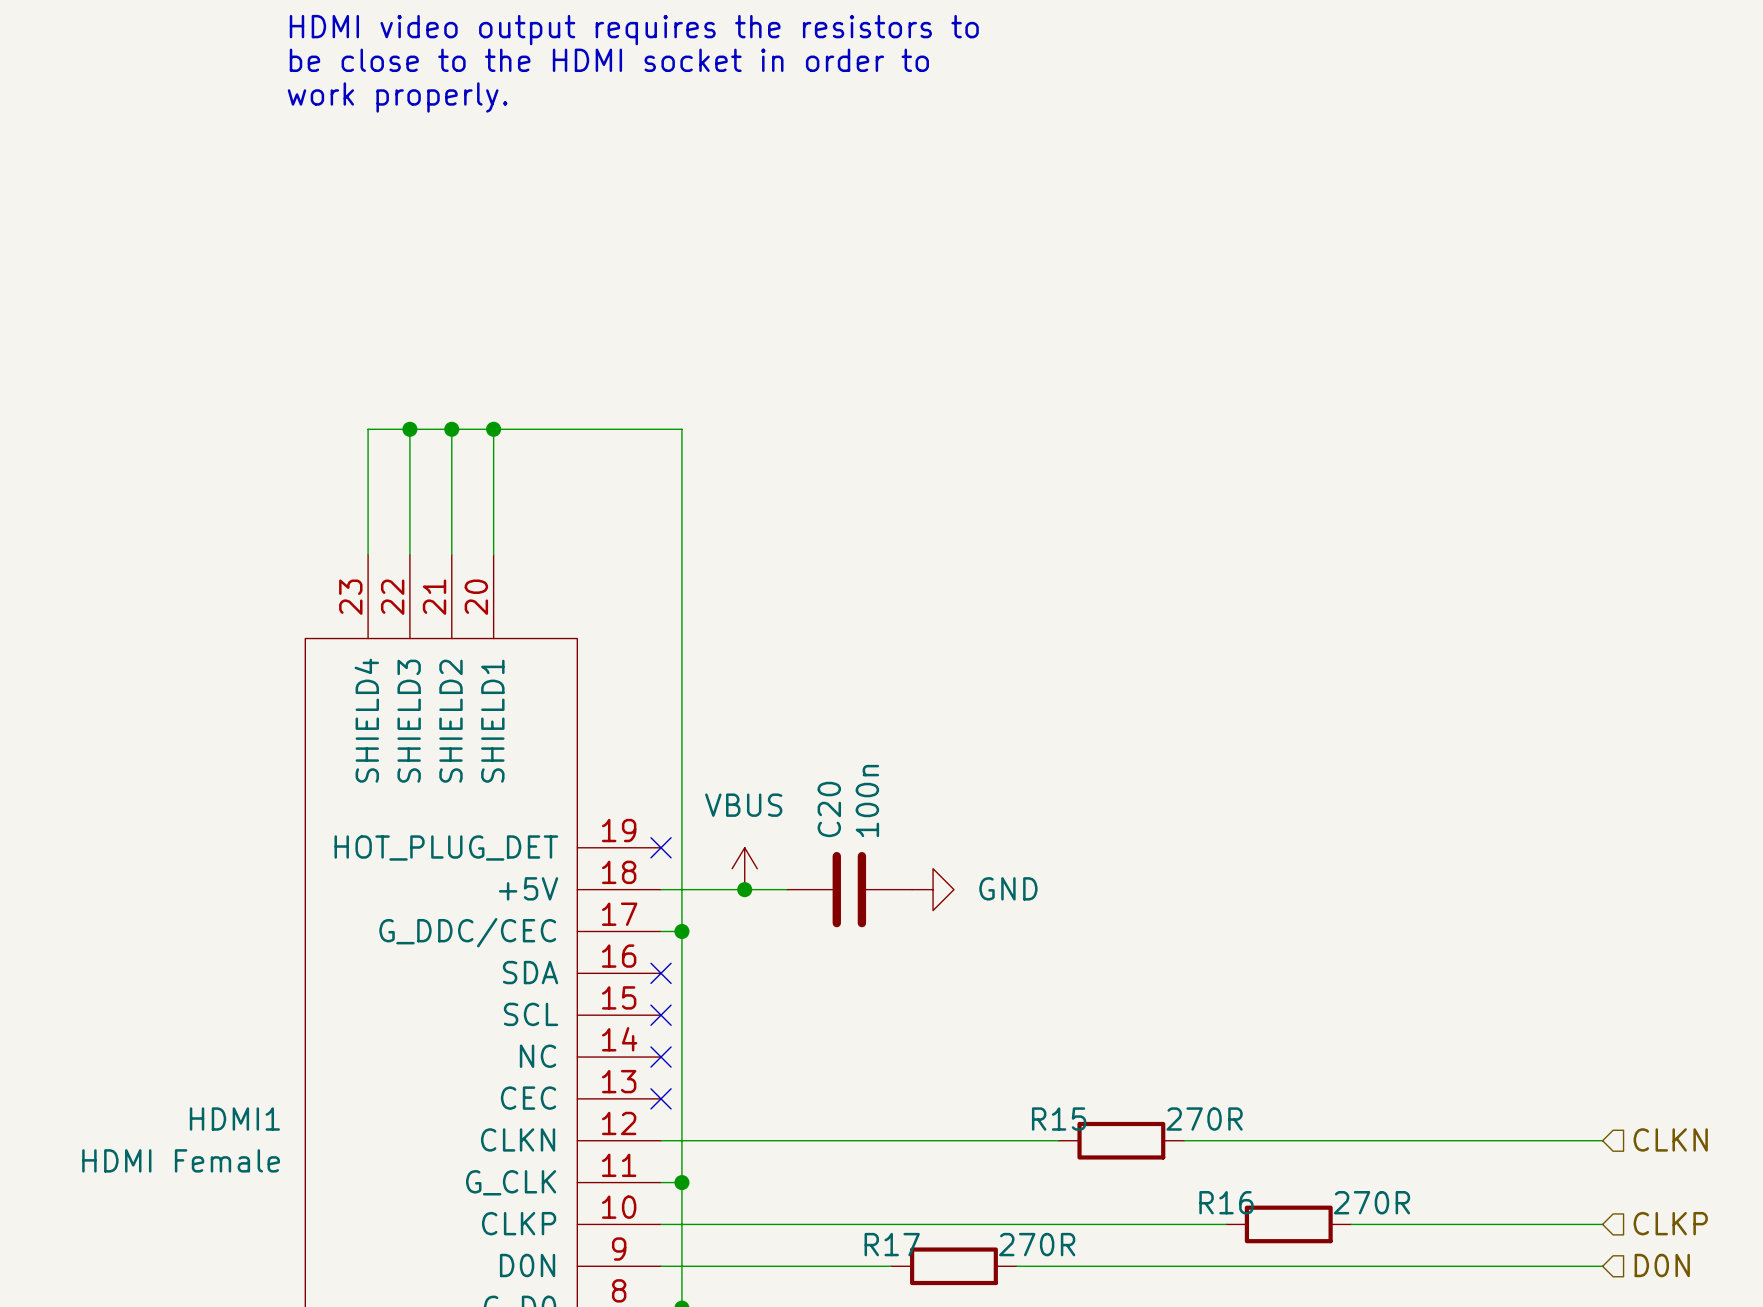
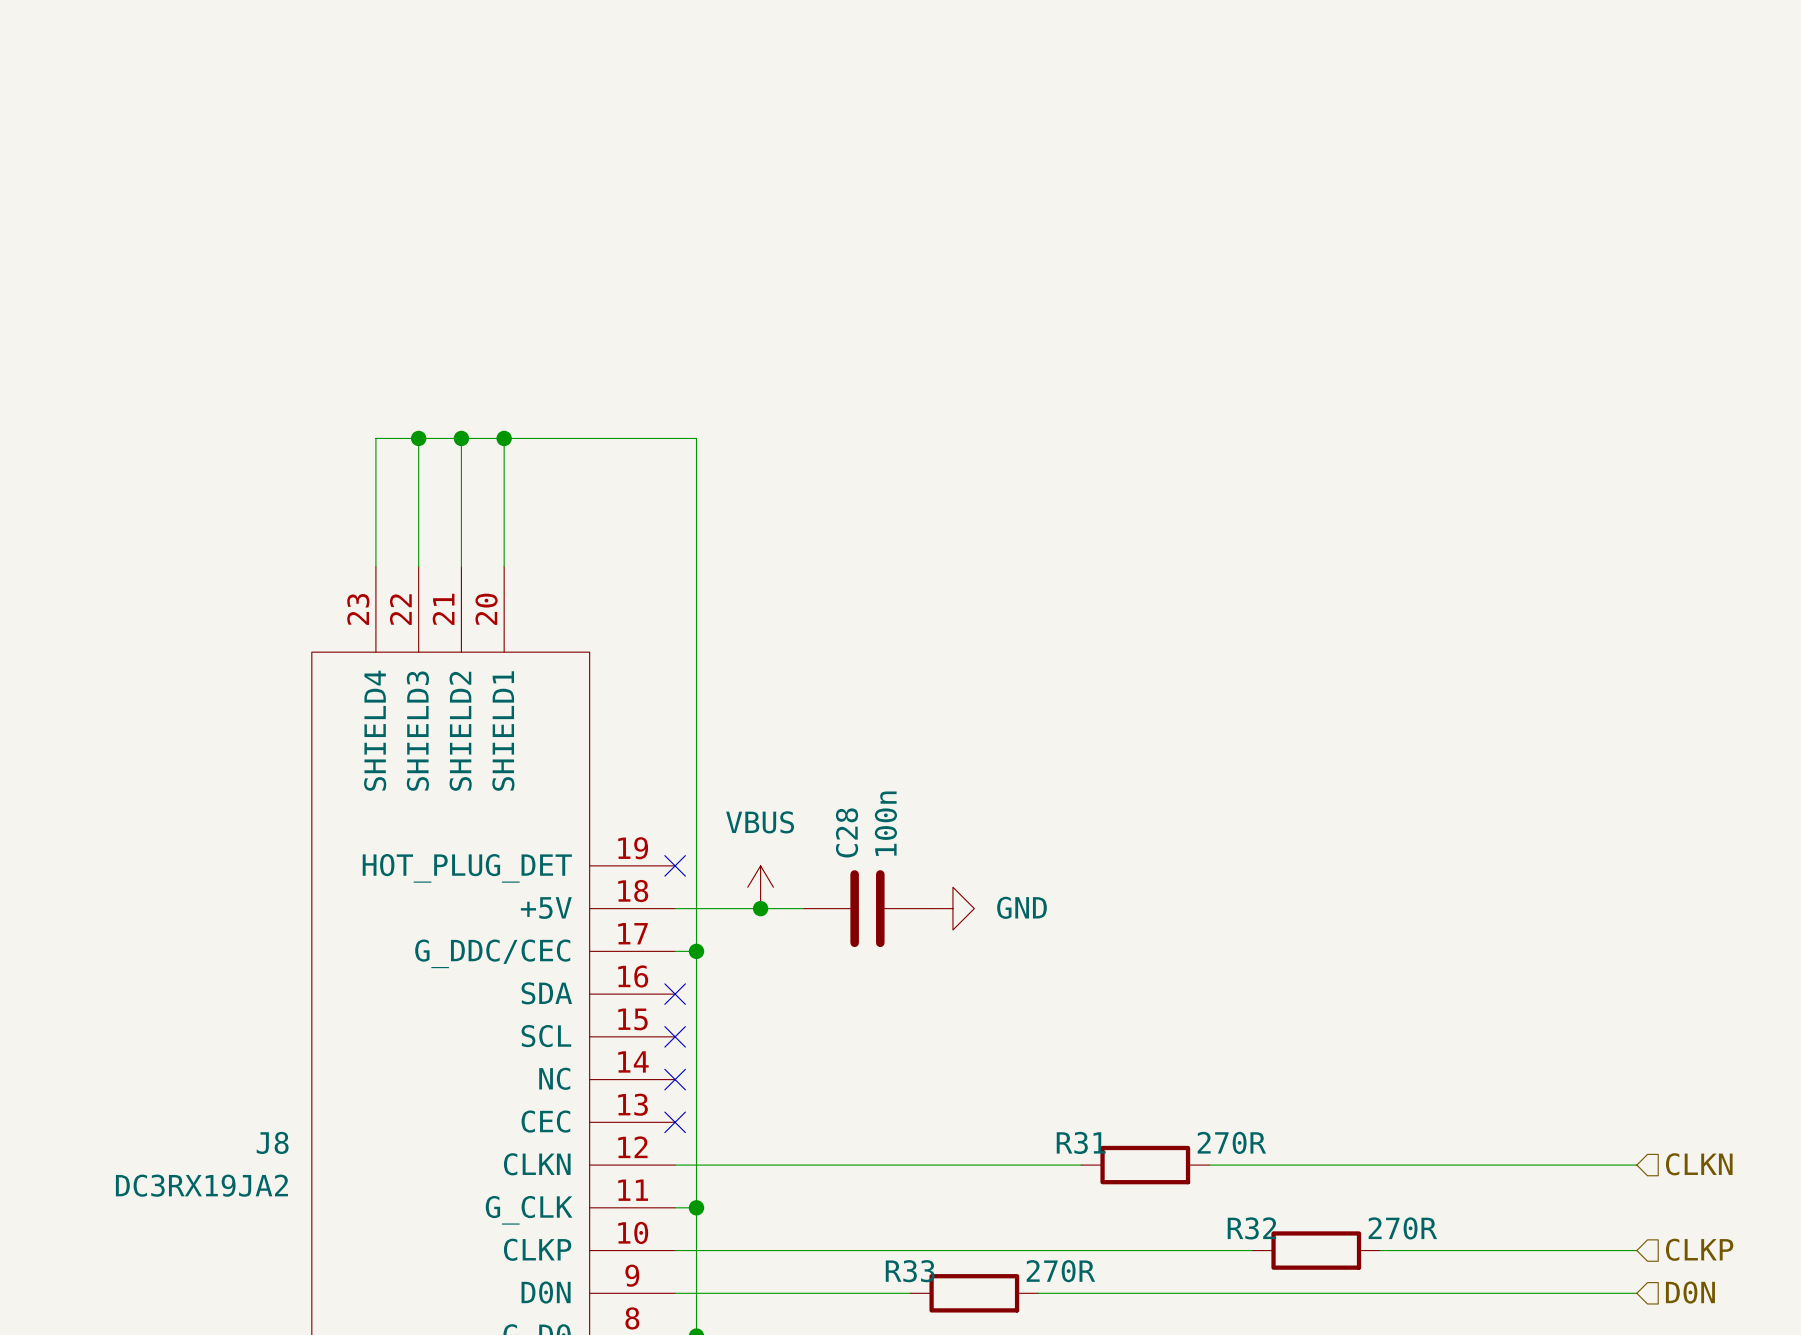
text: HDMI video output requires the resistors to (634, 30) -> none
text: be close to the HDMI socket in order to (609, 60) -> none
text: work properly. (397, 97) -> none
C20 name: C20 (829, 809) -> C28 (847, 832)
HDMI1 name: HDMI1 (234, 1119) -> J8 (272, 1142)
R15 name: R15 (1059, 1119) -> R31 (1081, 1142)
HDMI1 value: HDMI Female (181, 1160) -> DC3RX19JA2 (201, 1185)
R16 name: R16 (1226, 1202) -> R32 (1251, 1228)
R17 name: R17 (892, 1244) -> R33 (910, 1271)

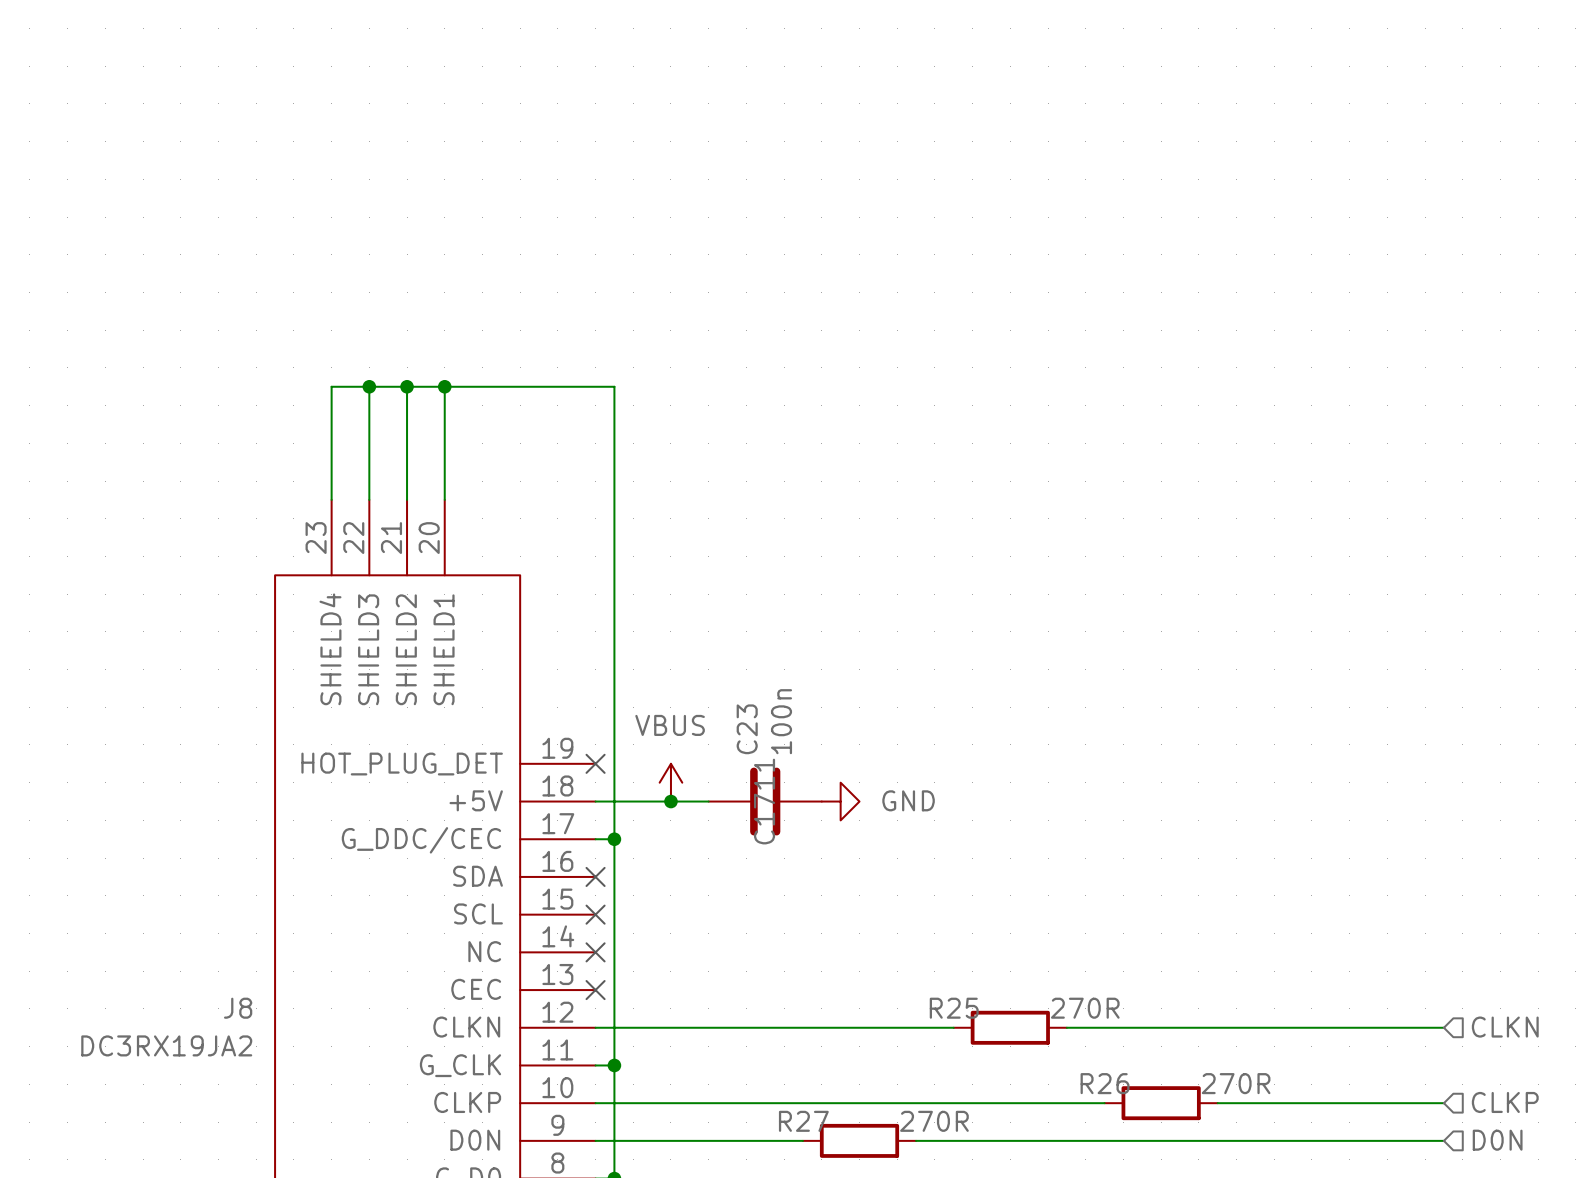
C28 name: C28 (847, 832) -> C23 (747, 729)
C28 text: none -> C1711 (764, 801)
R31 name: R31 (1081, 1142) -> R25 (954, 1008)
R32 name: R32 (1251, 1228) -> R26 (1105, 1083)
R33 name: R33 (910, 1271) -> R27 (803, 1121)

